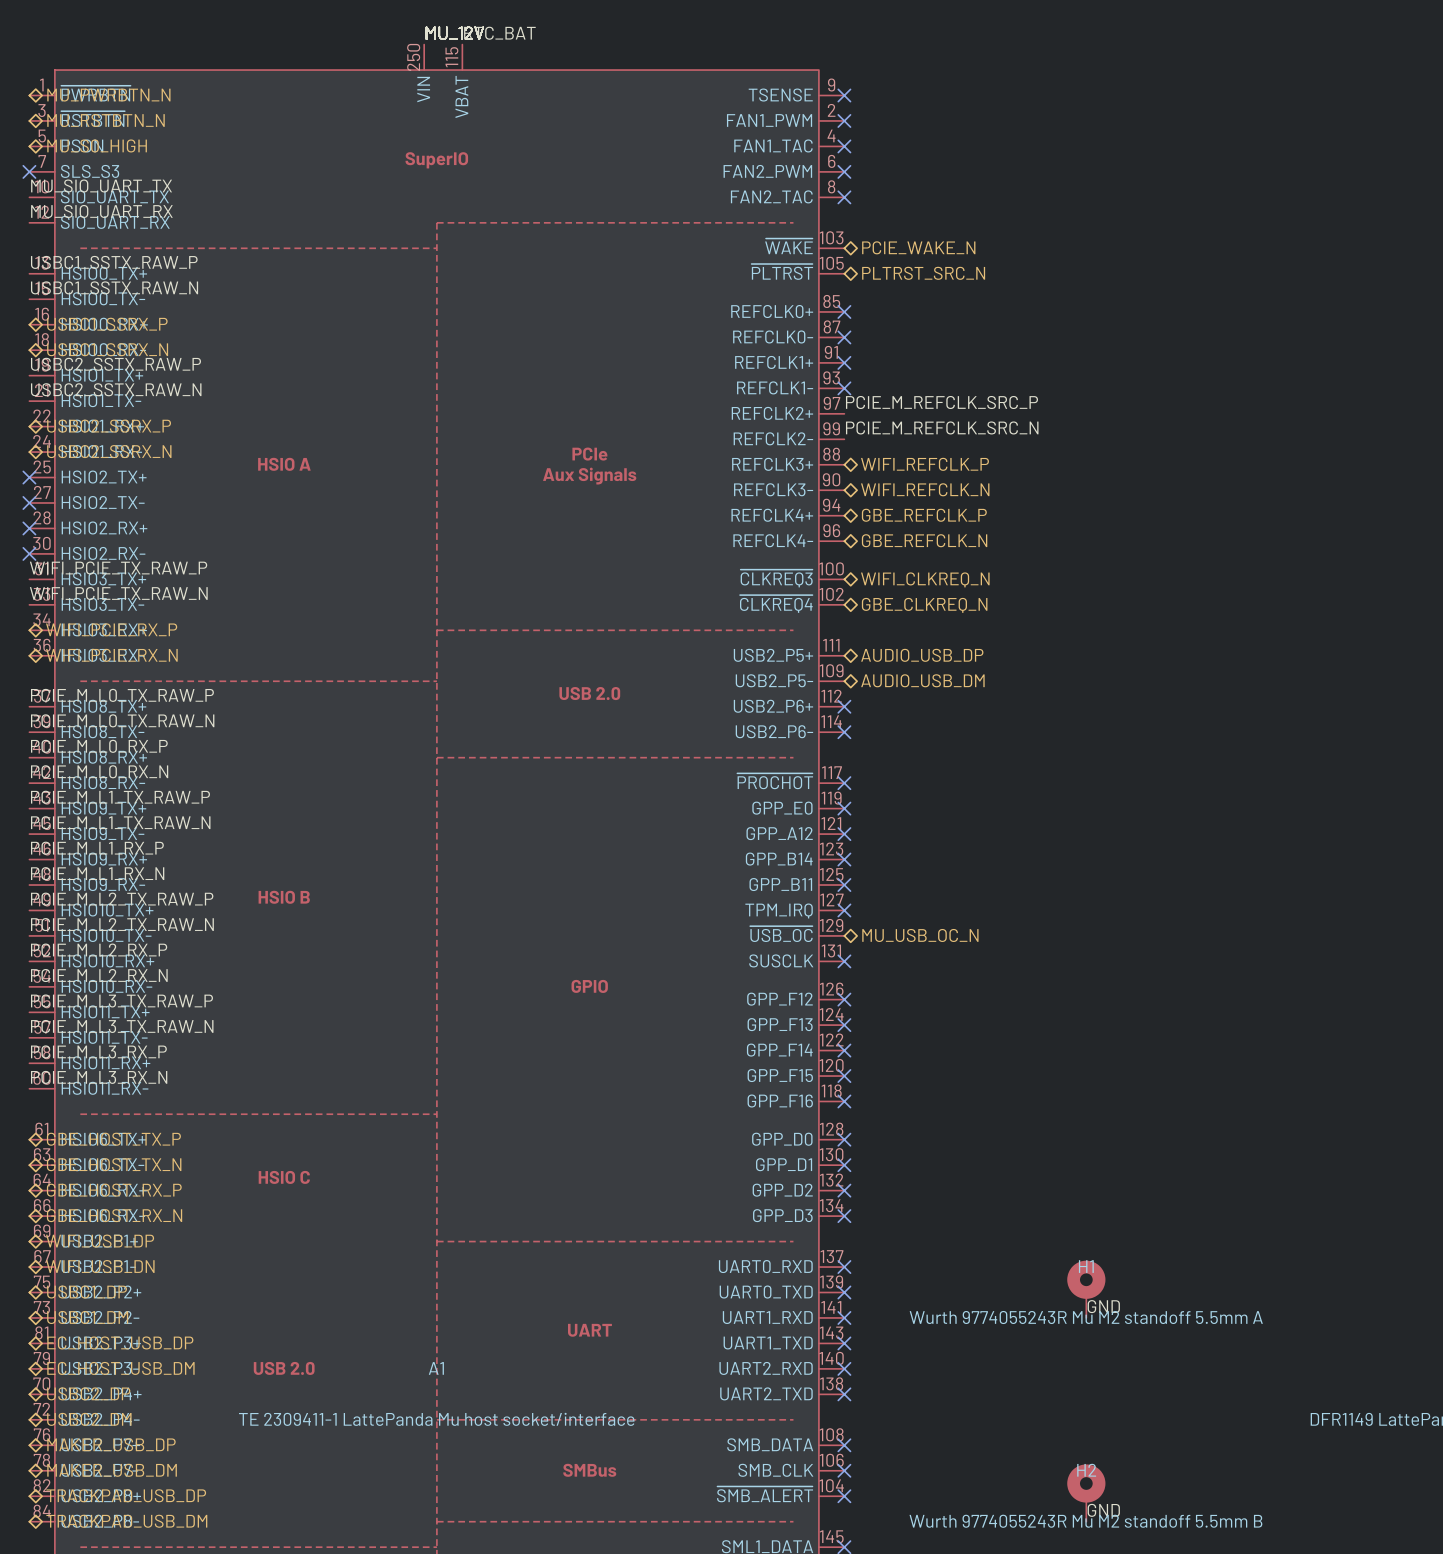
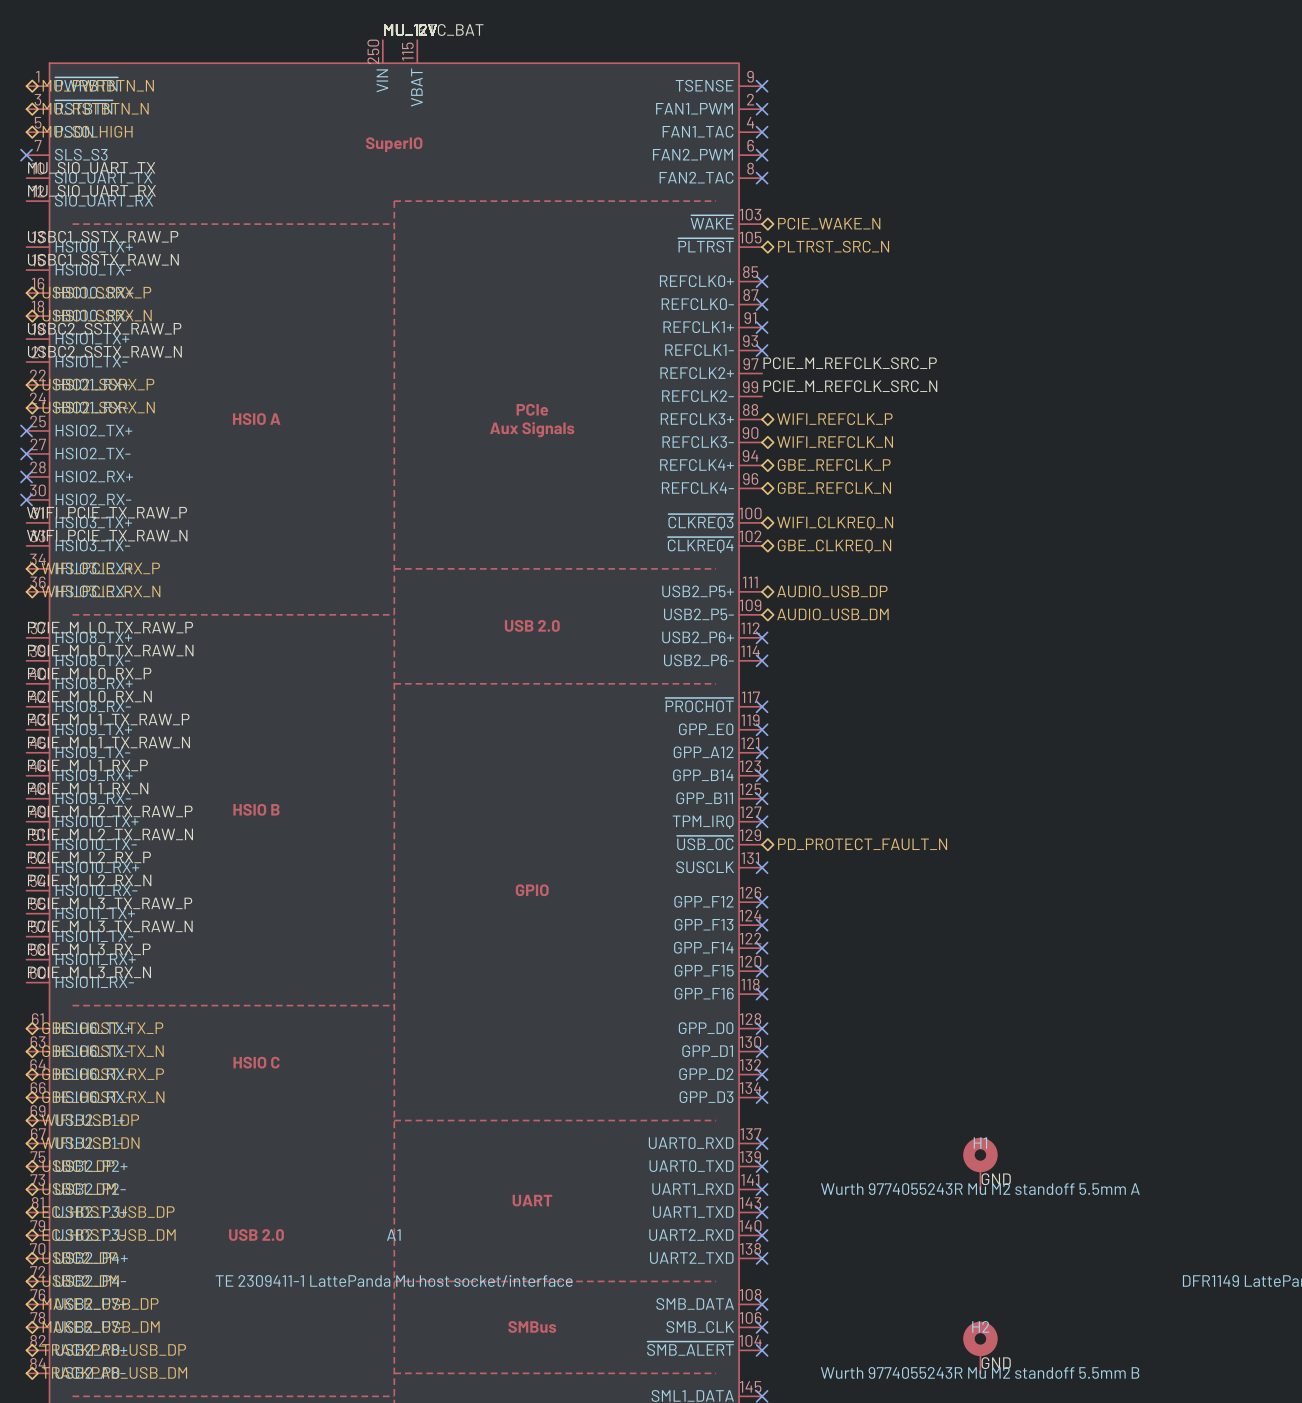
hierarchical label: MU_USB_OC_N (920, 935) -> PD_PROTECT_FAULT_N (862, 844)

